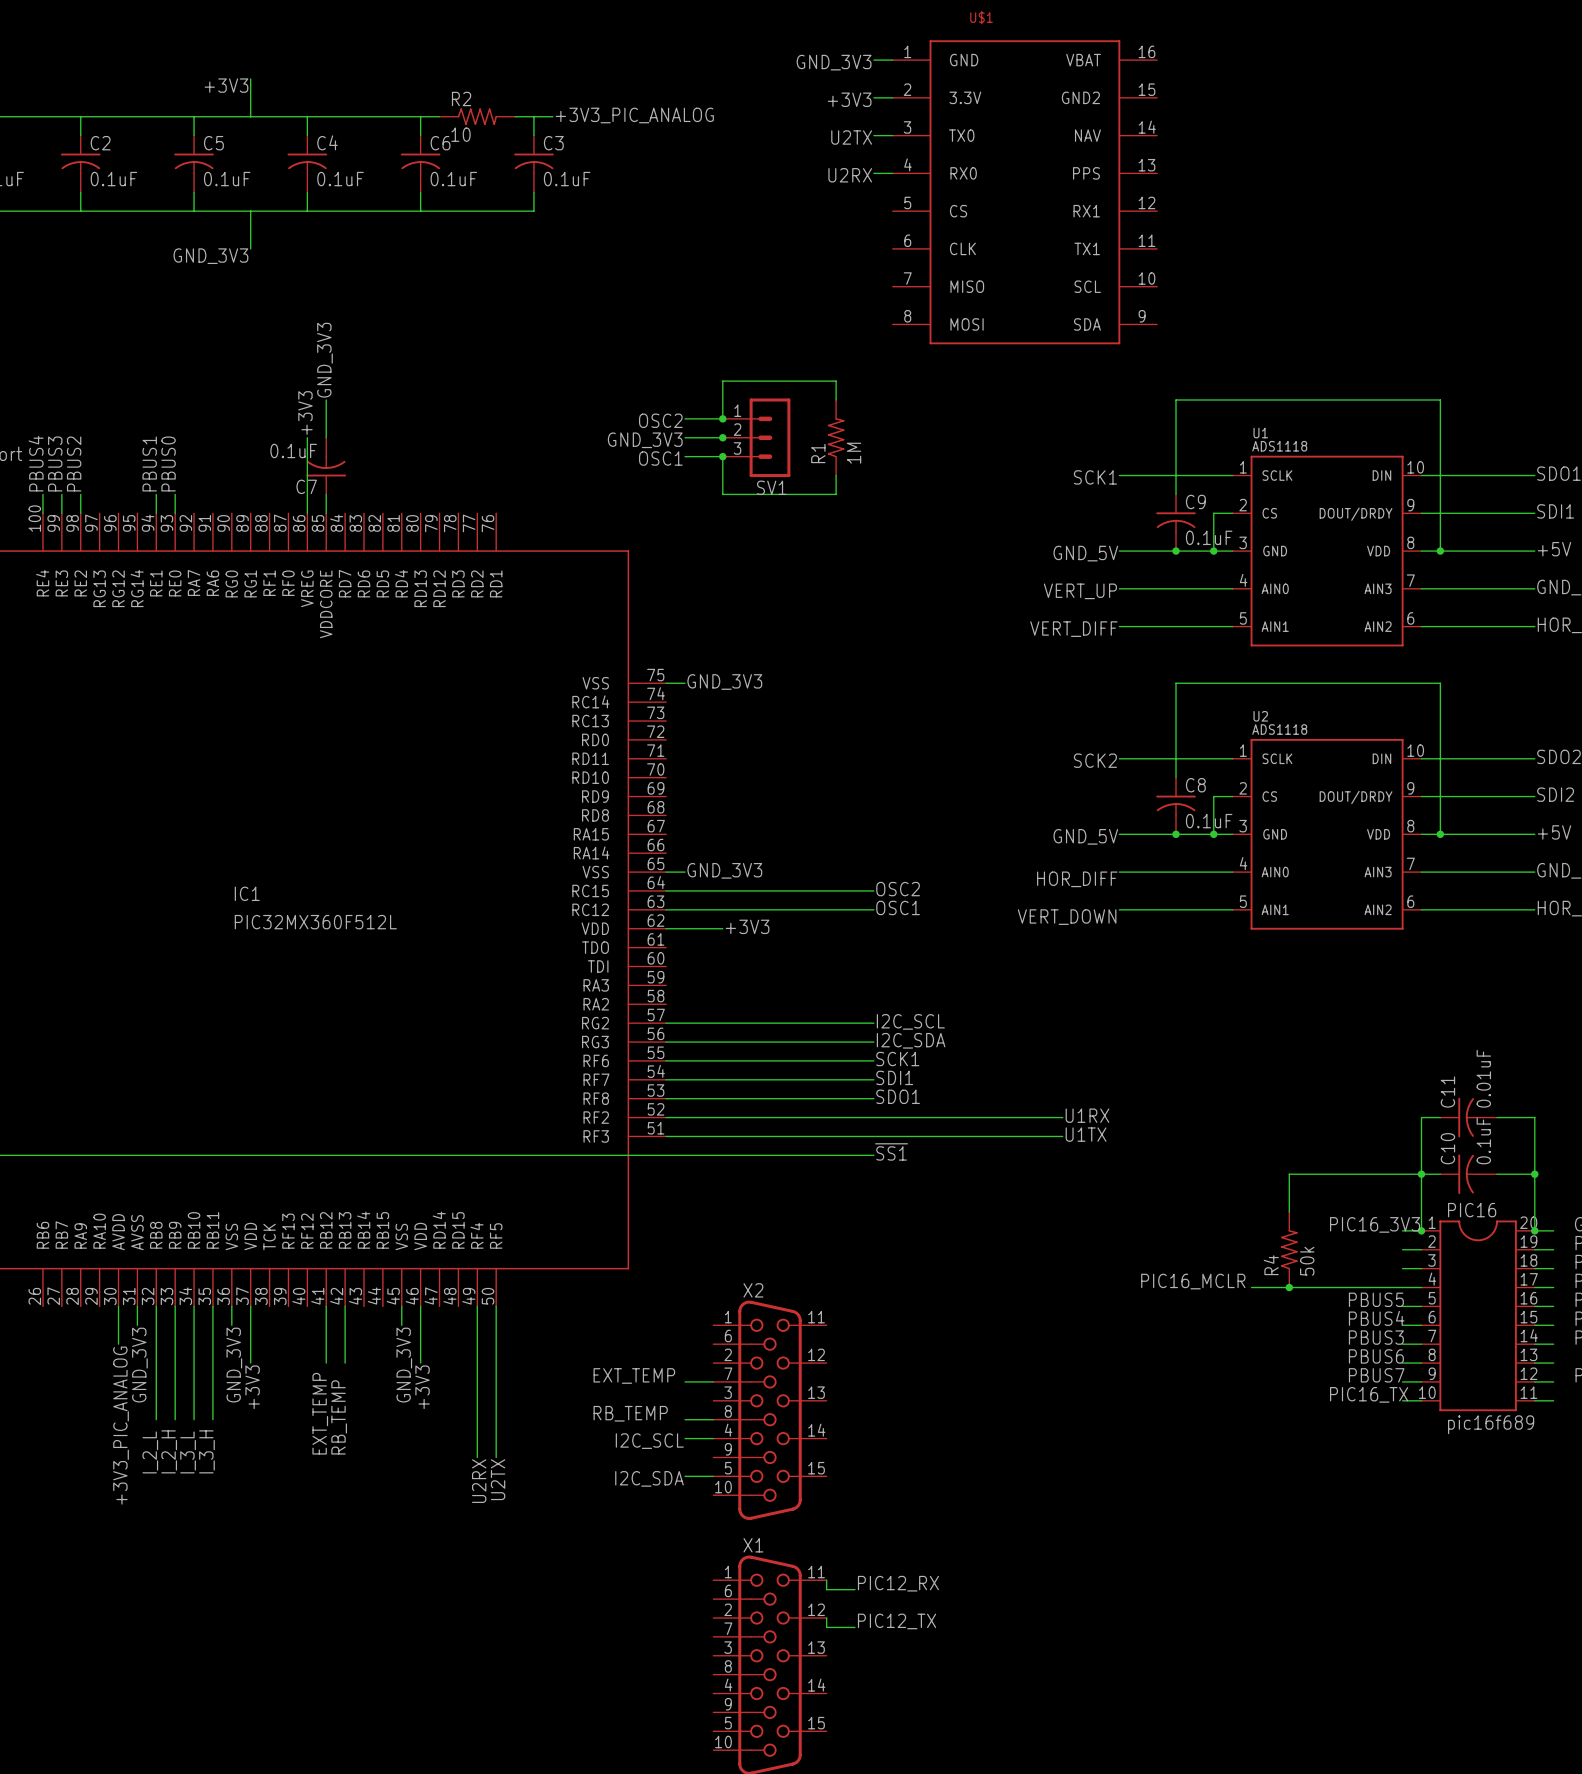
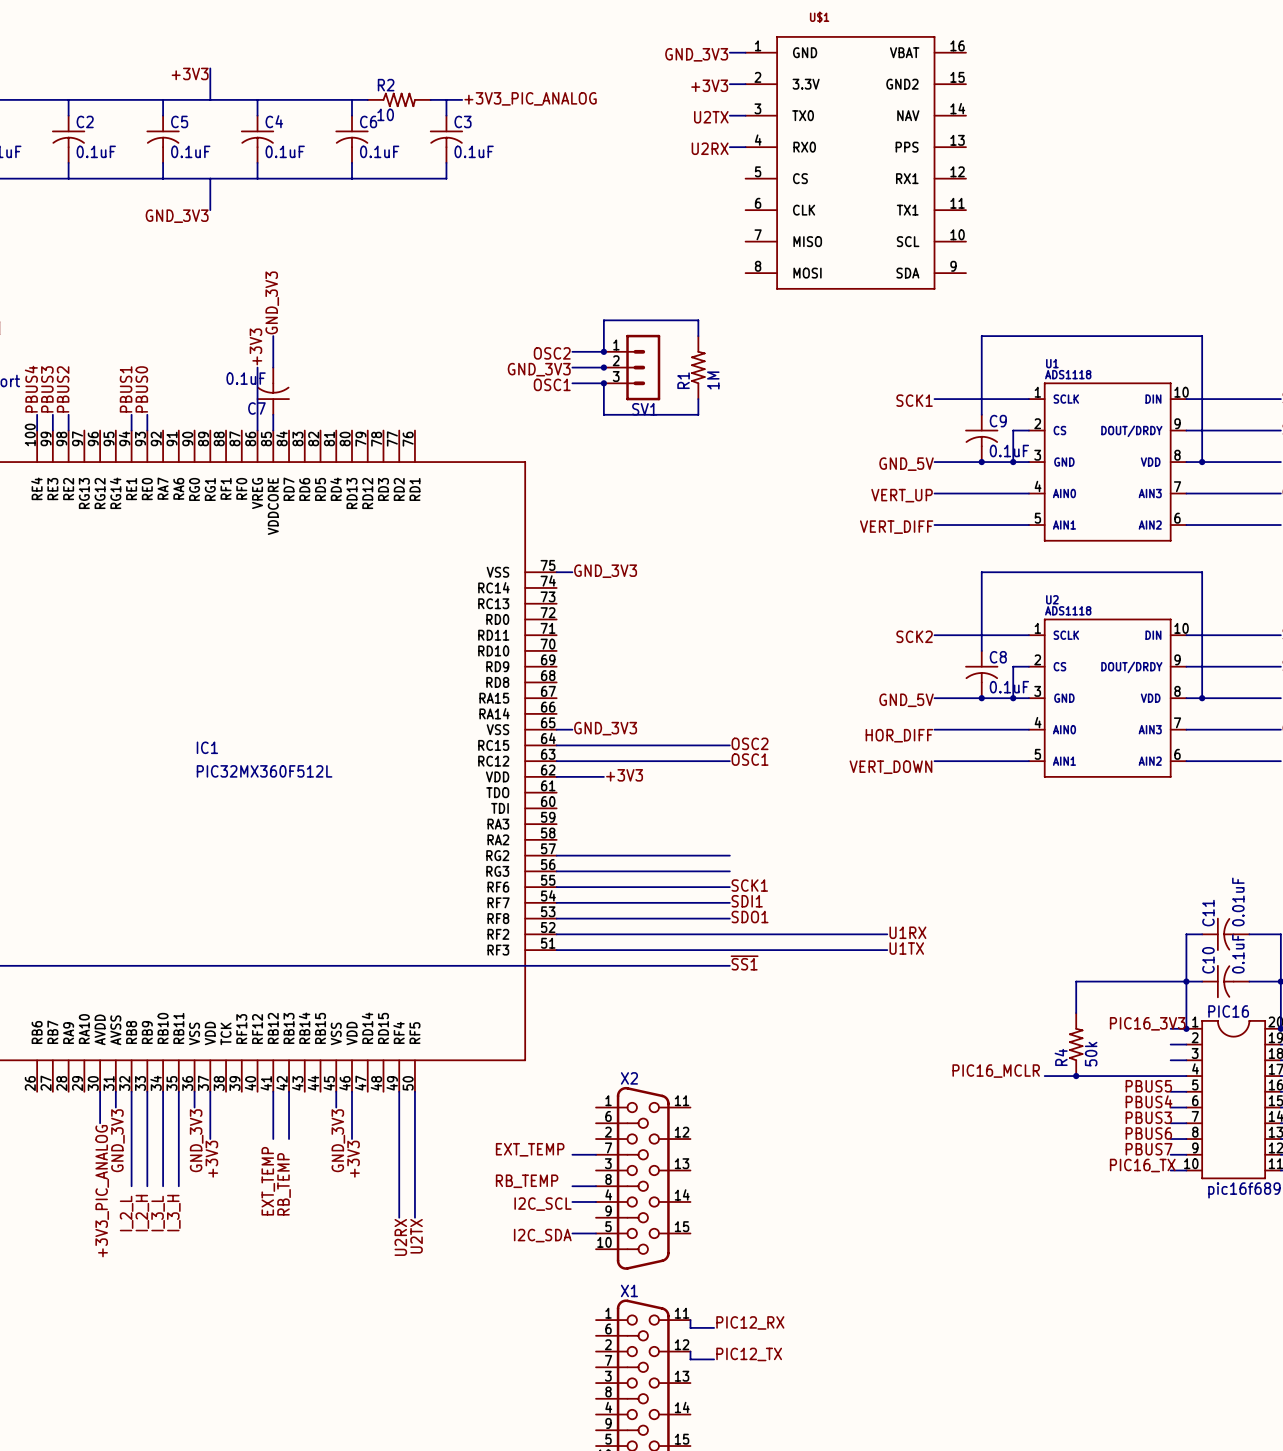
label: I2C_SCL (910, 1021) -> none
label: I2C_SDA (911, 1040) -> none

